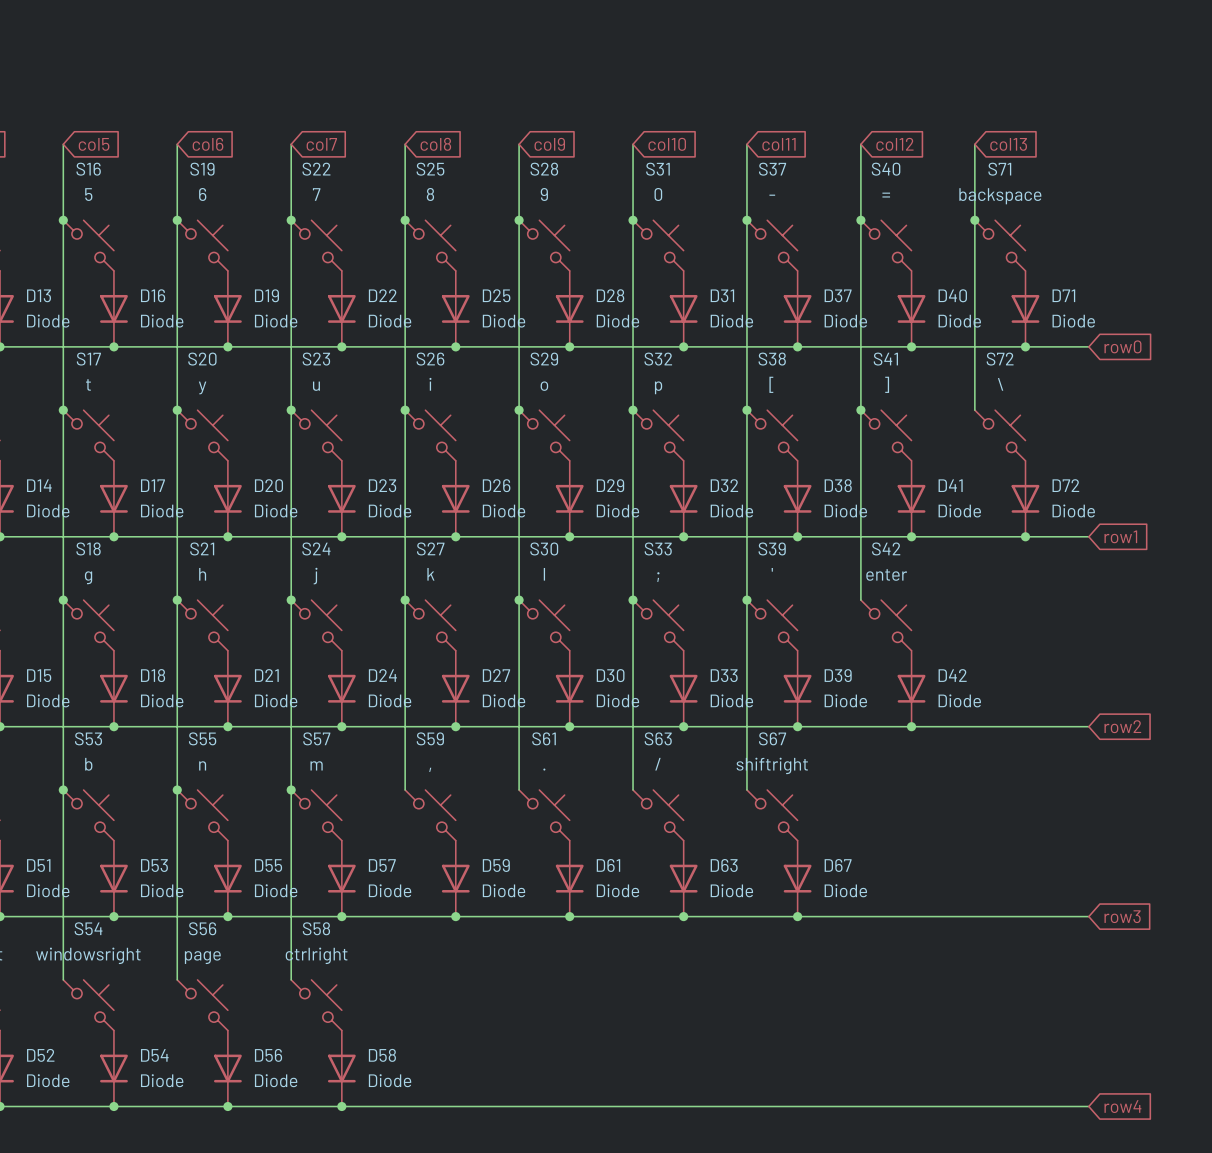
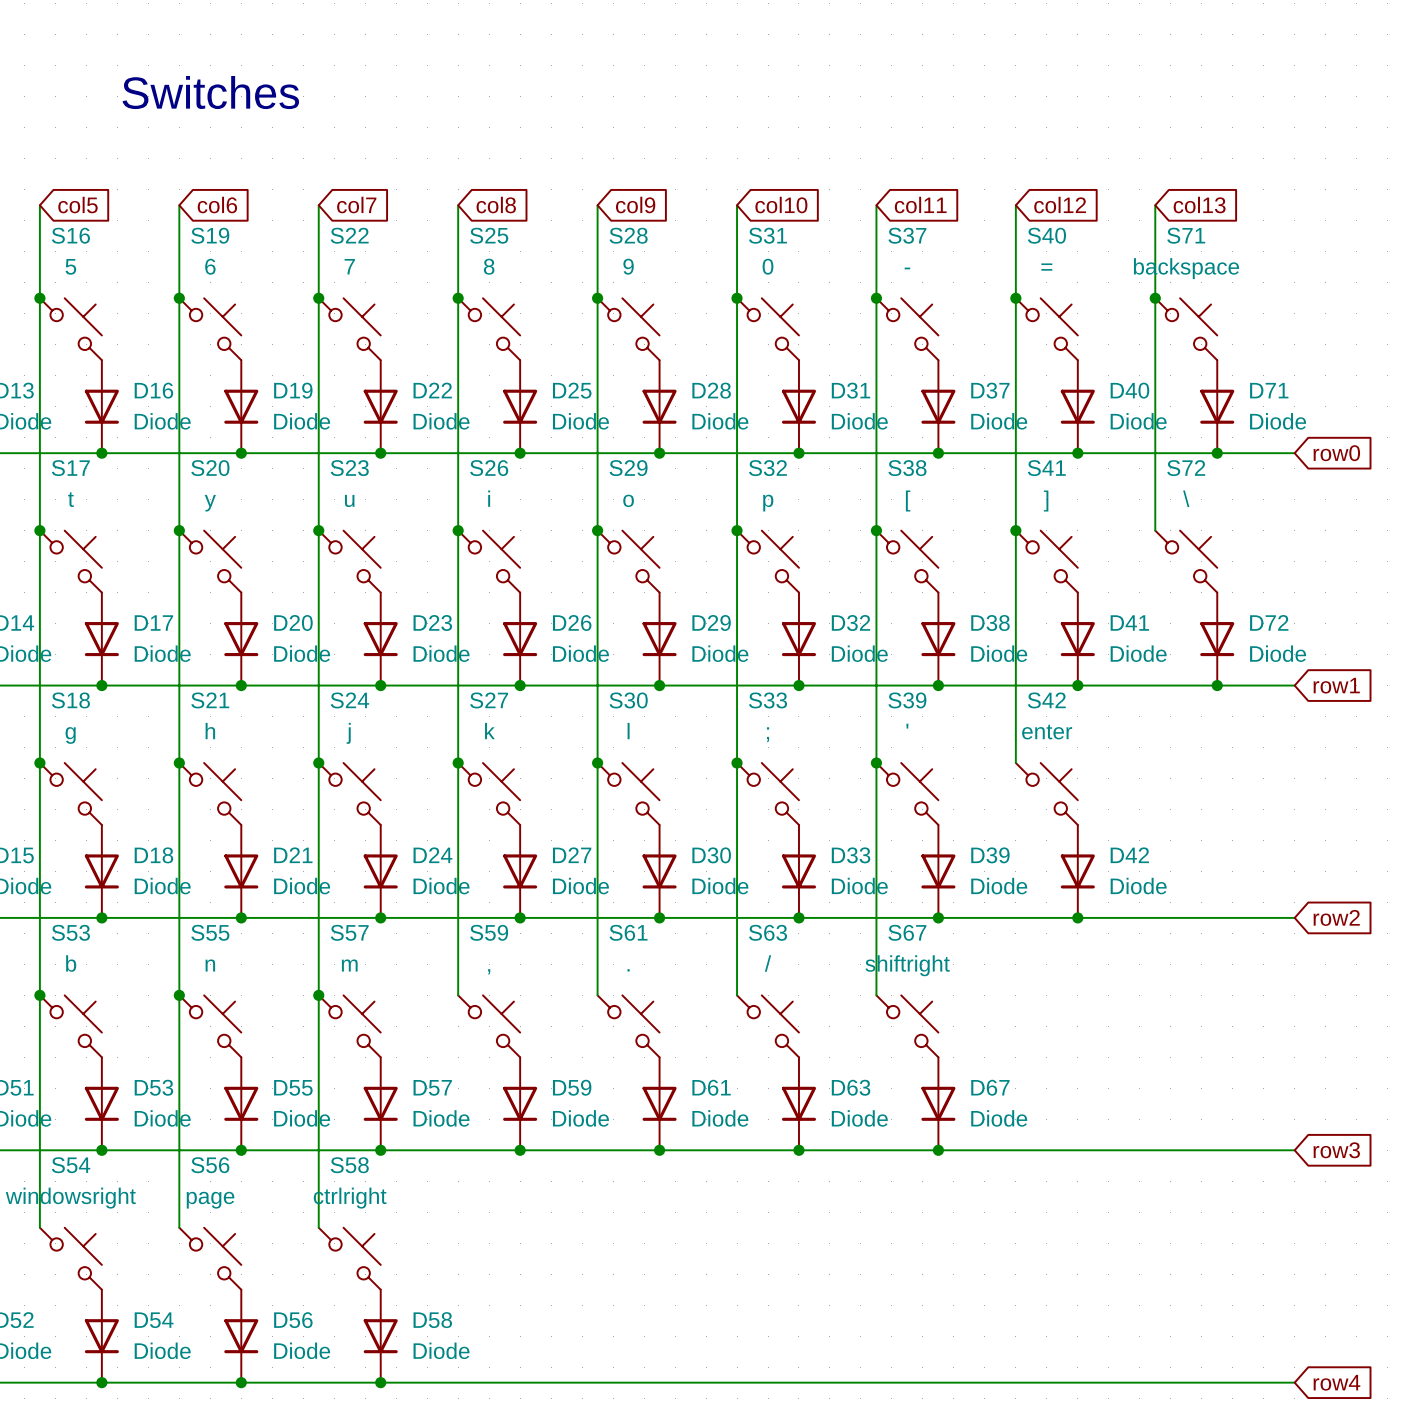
text: none -> Switches (210, 92)

